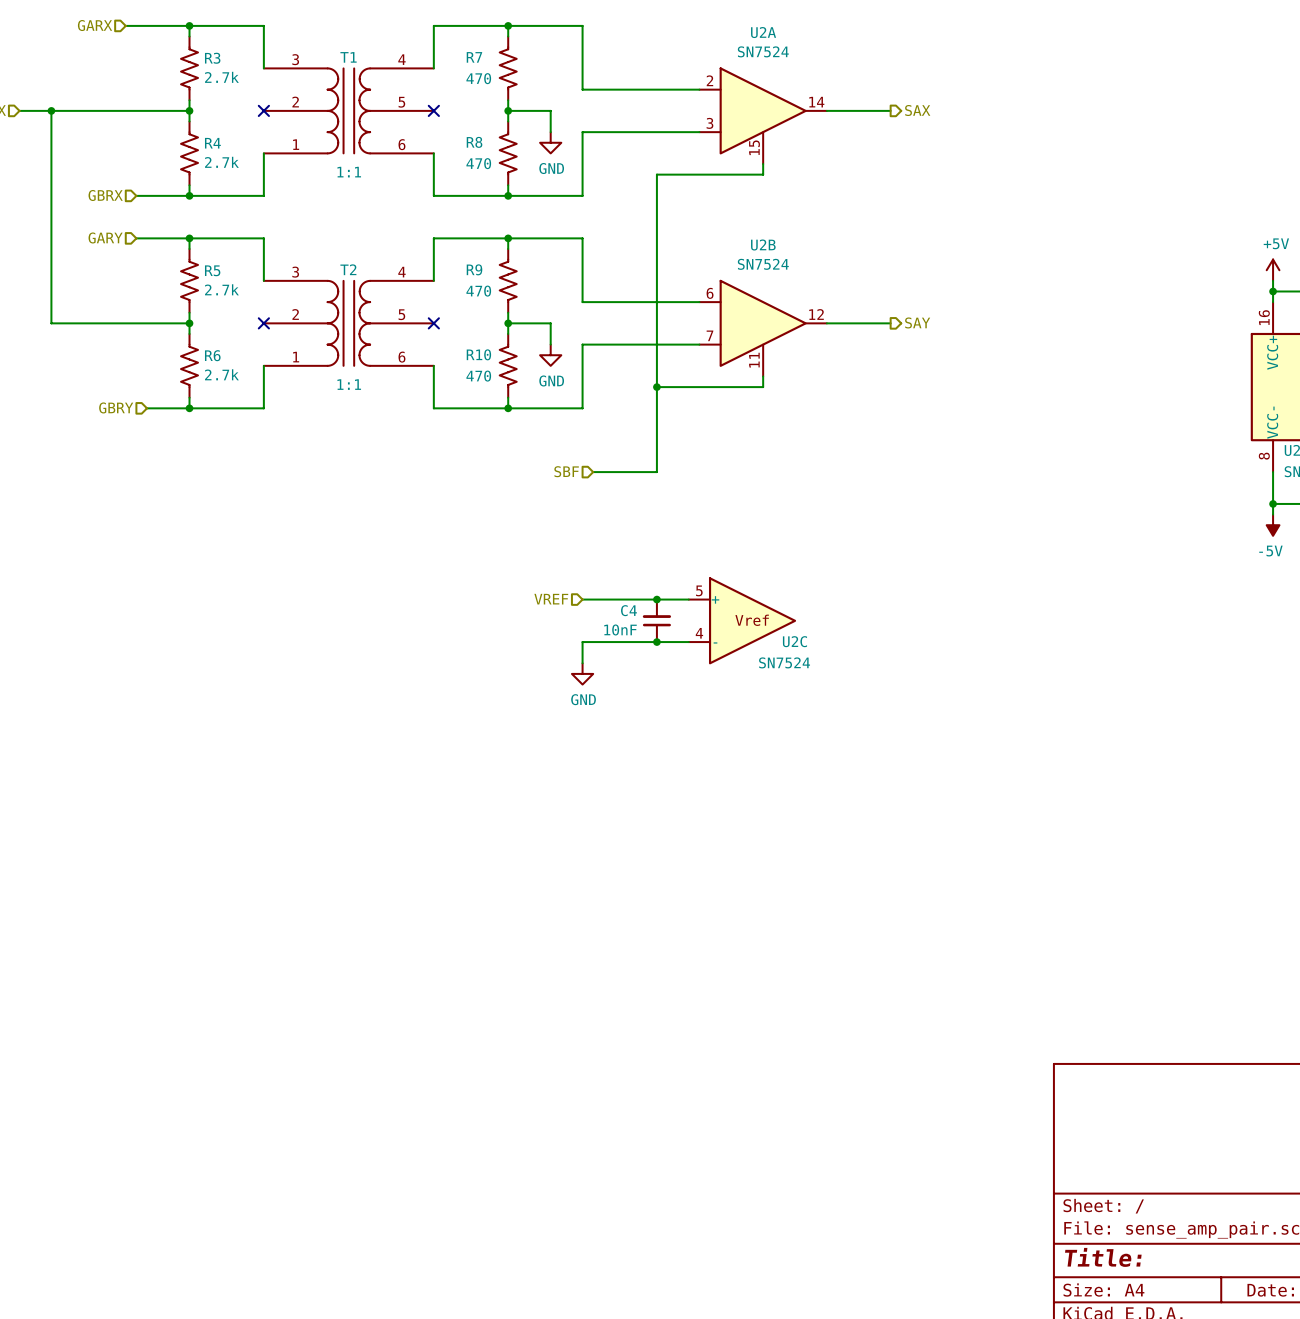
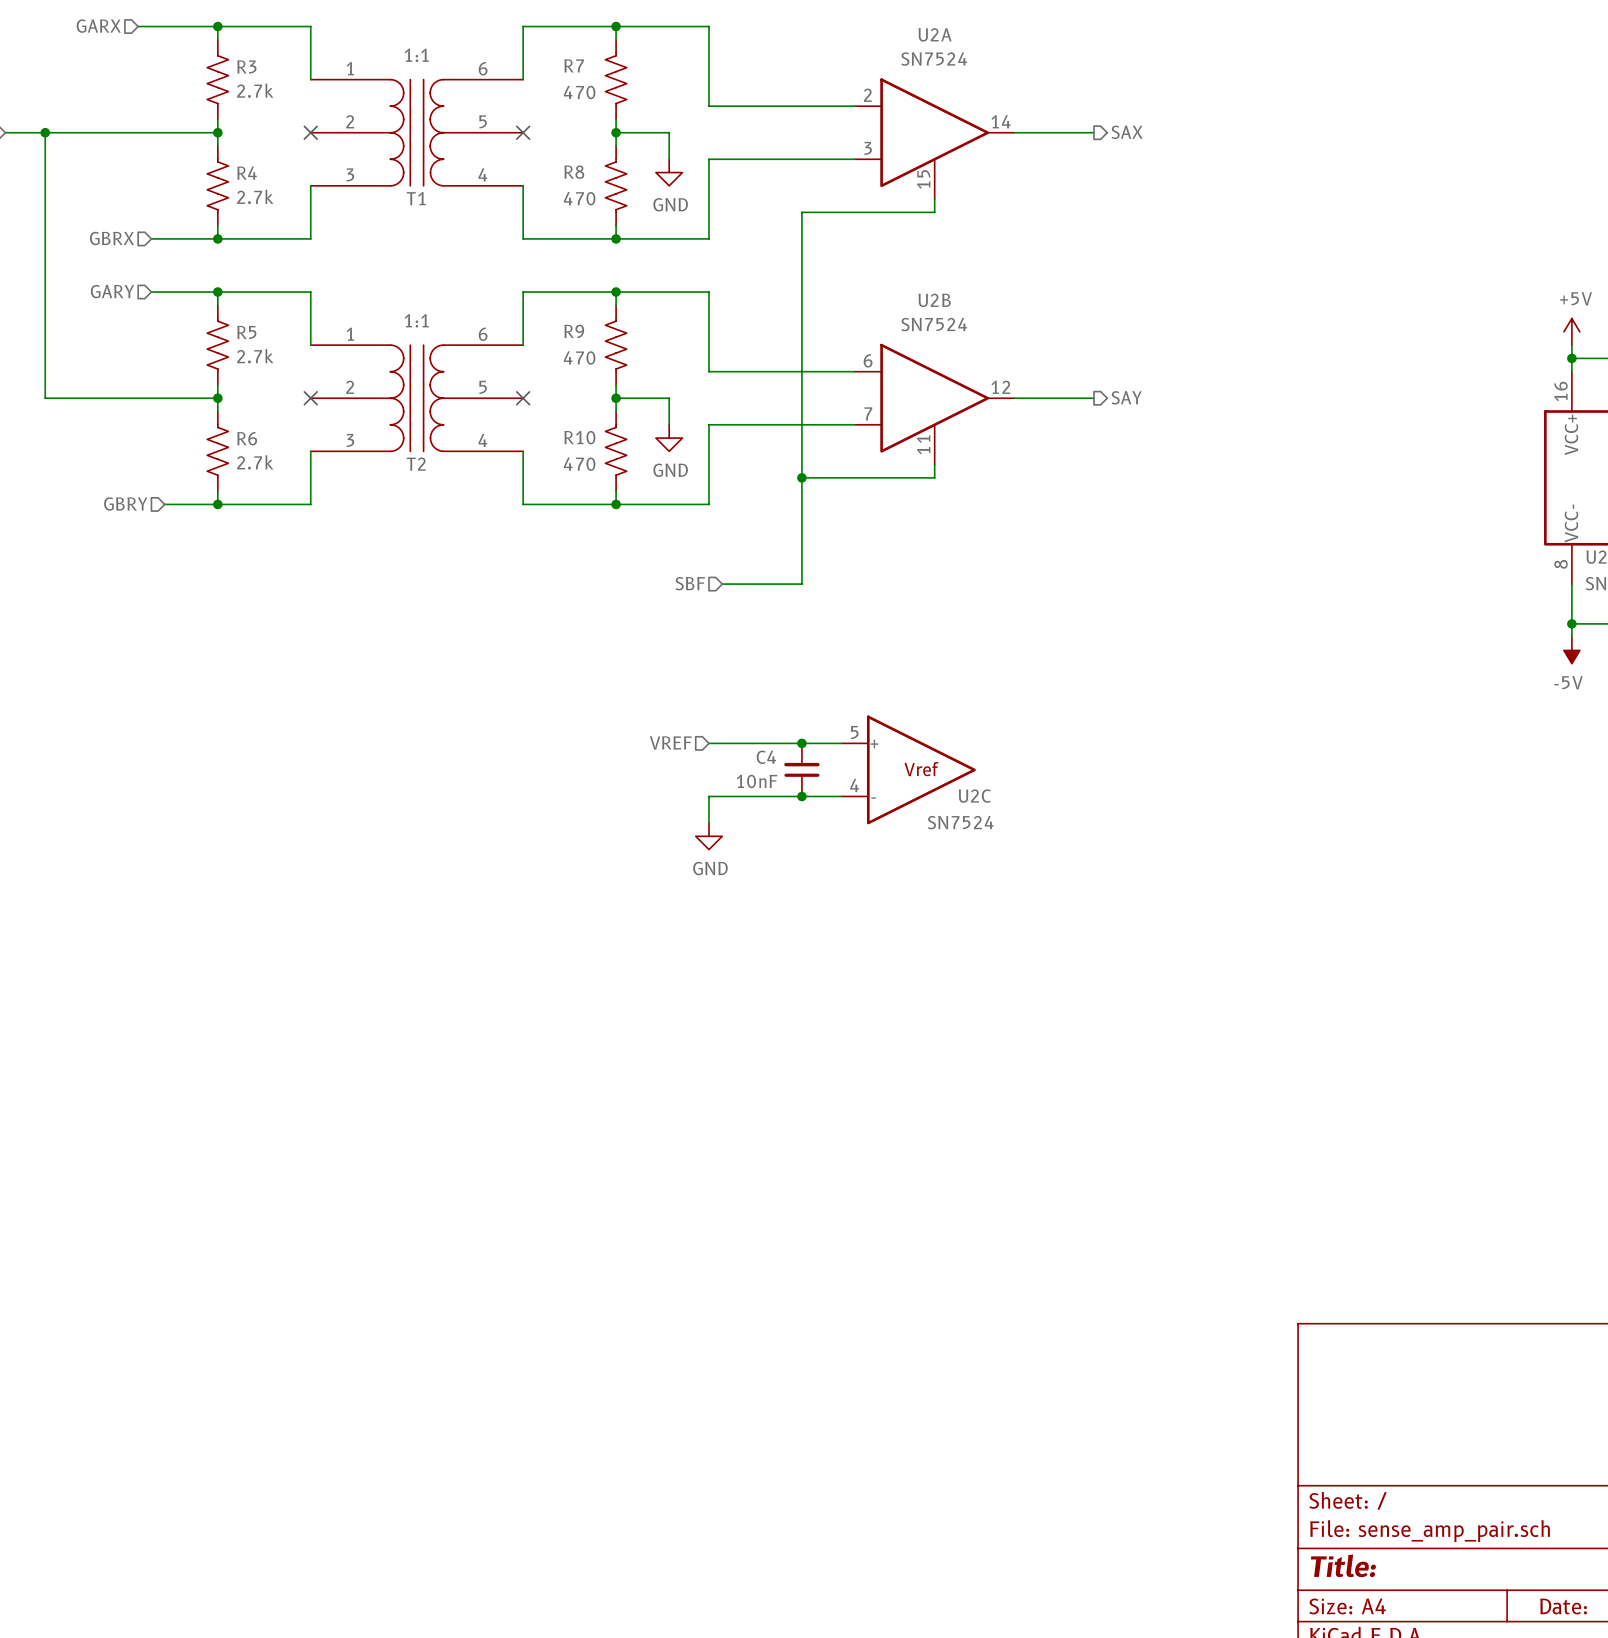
T1 flip: as is (348, 110) -> up-down (416, 132)
T2 flip: as is (348, 323) -> up-down (416, 398)

